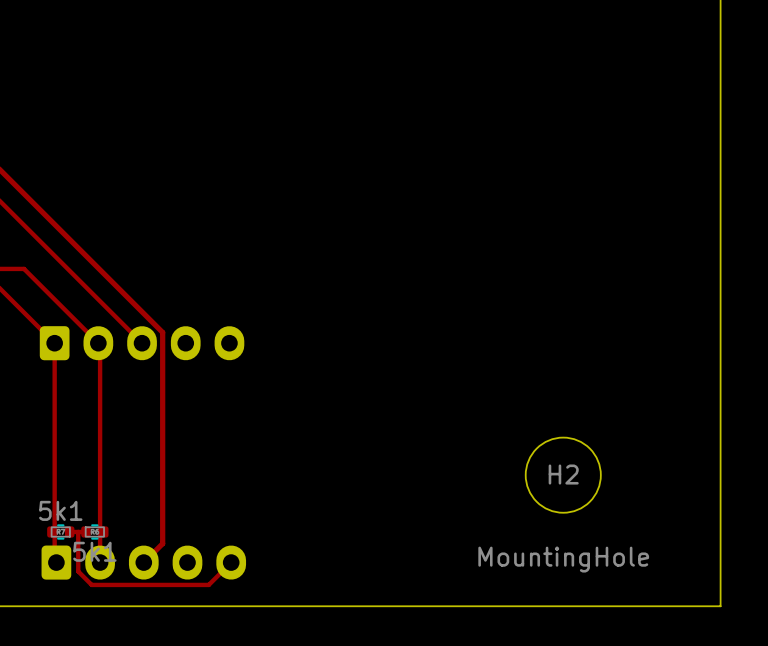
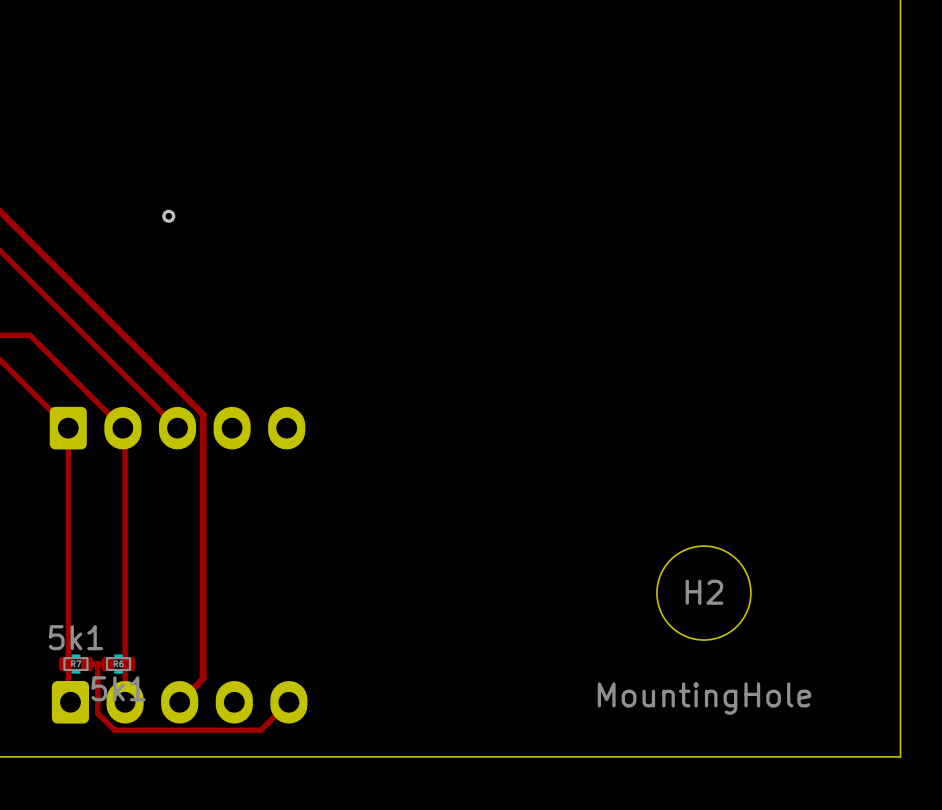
via: none -> (168, 216)

